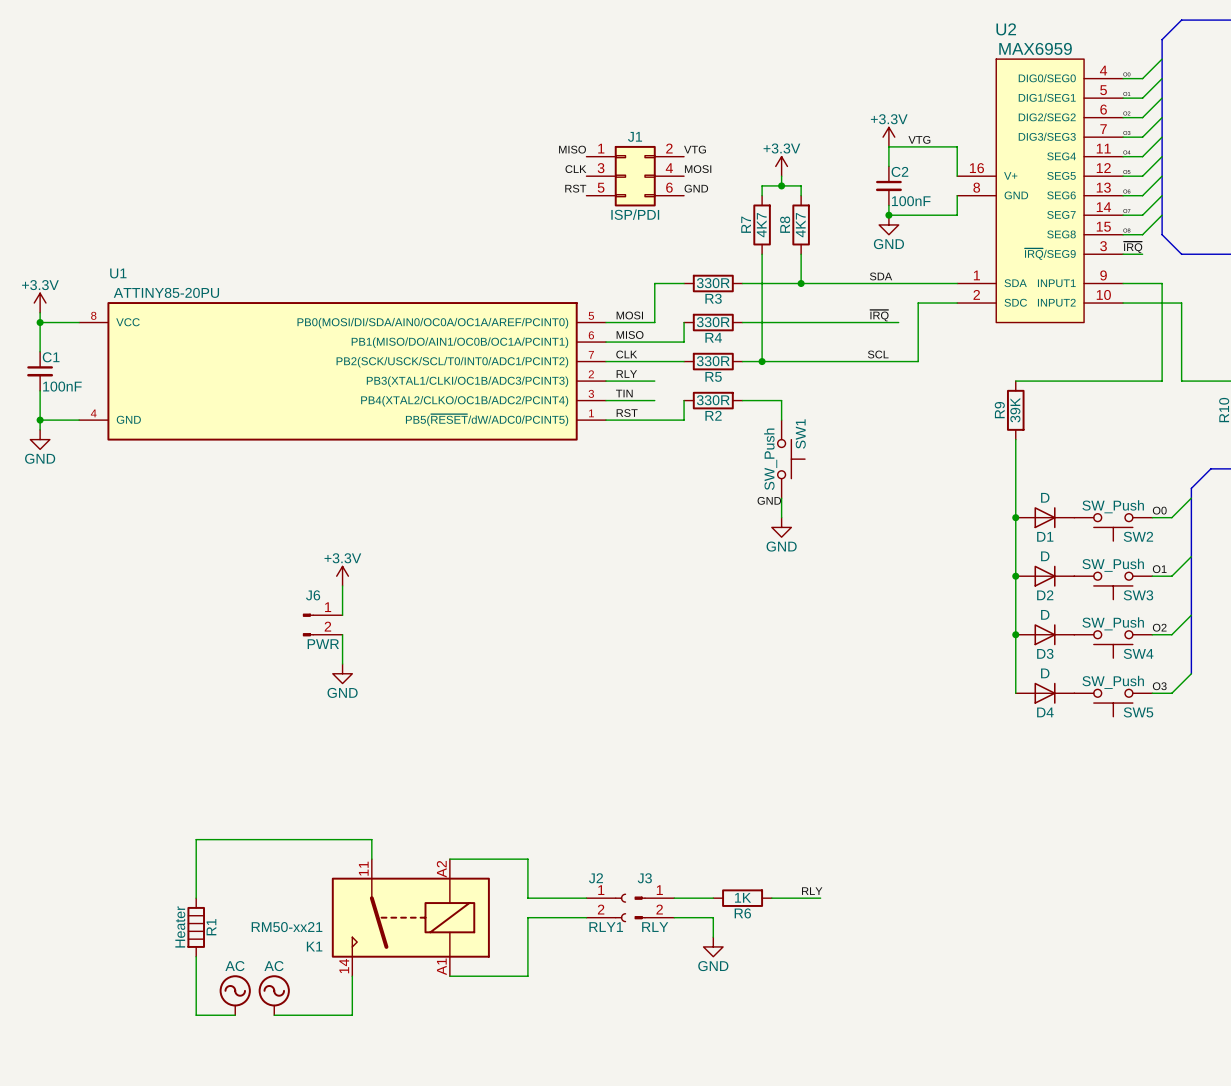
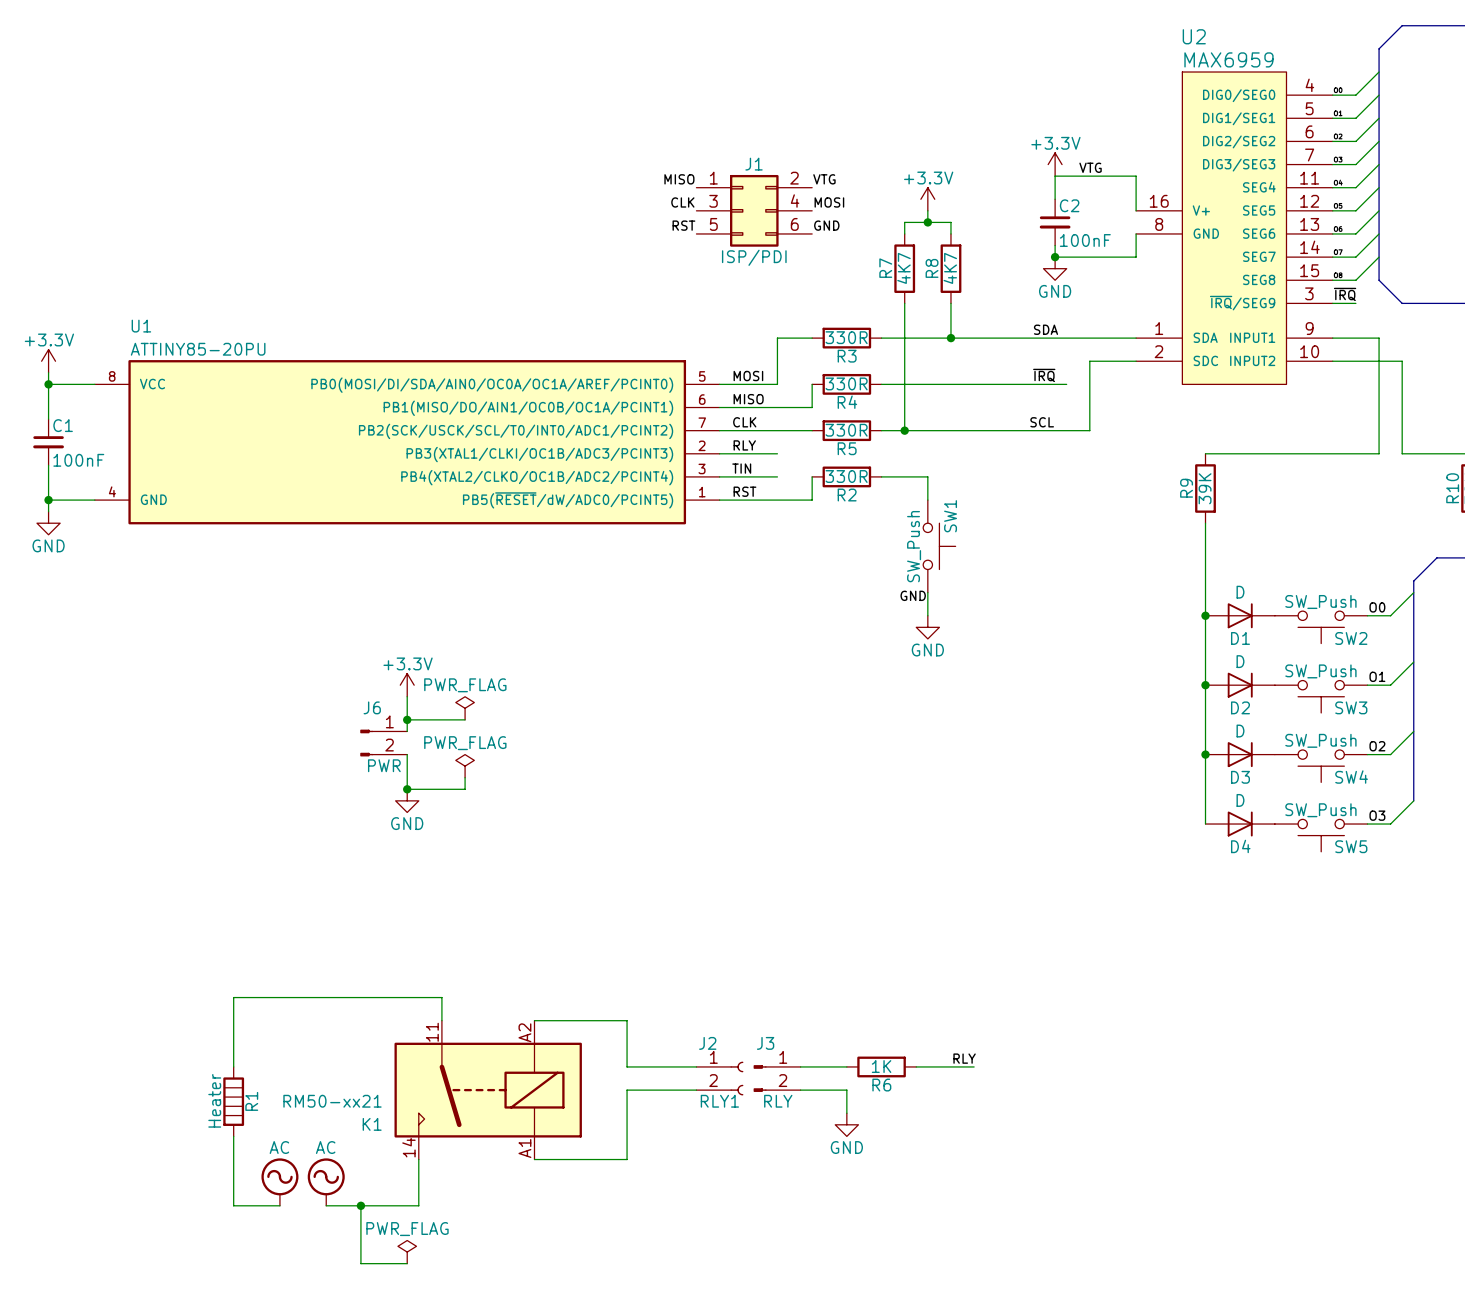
power symbol: none -> PWR_FLAG (465, 708)
wire: none -> (407, 719) (465, 719)
junction: none -> (407, 719)
power symbol: none -> PWR_FLAG (465, 766)
wire: none -> (465, 777) (465, 789) (407, 789)
junction: none -> (407, 789)
wire: none -> (360, 1205) (360, 1263) (407, 1263)
junction: none -> (360, 1205)
power symbol: none -> PWR_FLAG (407, 1252)

